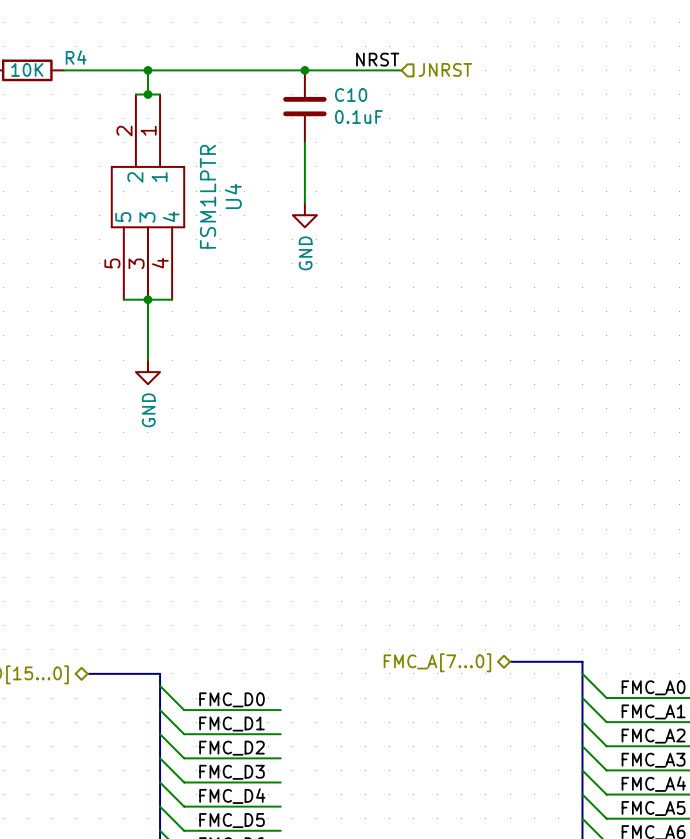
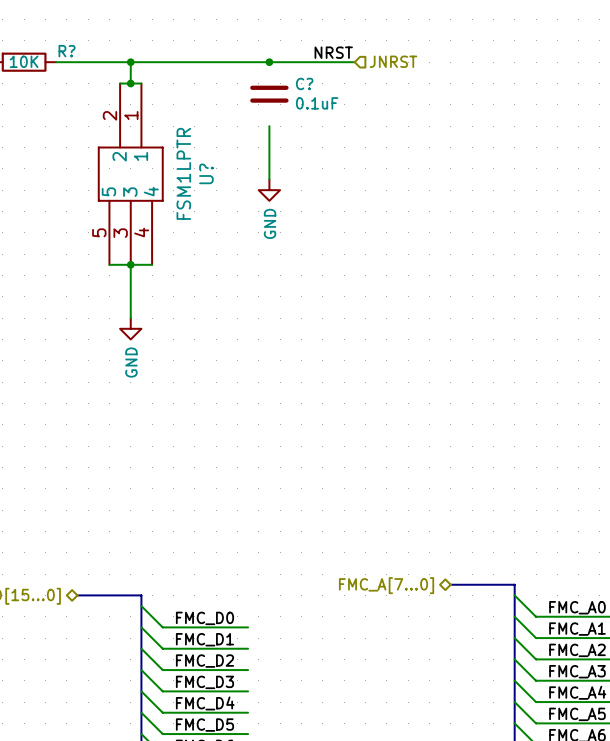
R4 name: R4 (76, 57) -> R? (67, 51)
C10: 0.1uF (304, 106) -> none
C?: none -> 0.1uF (269, 94)
U4 name: U4 (233, 196) -> U? (206, 173)

